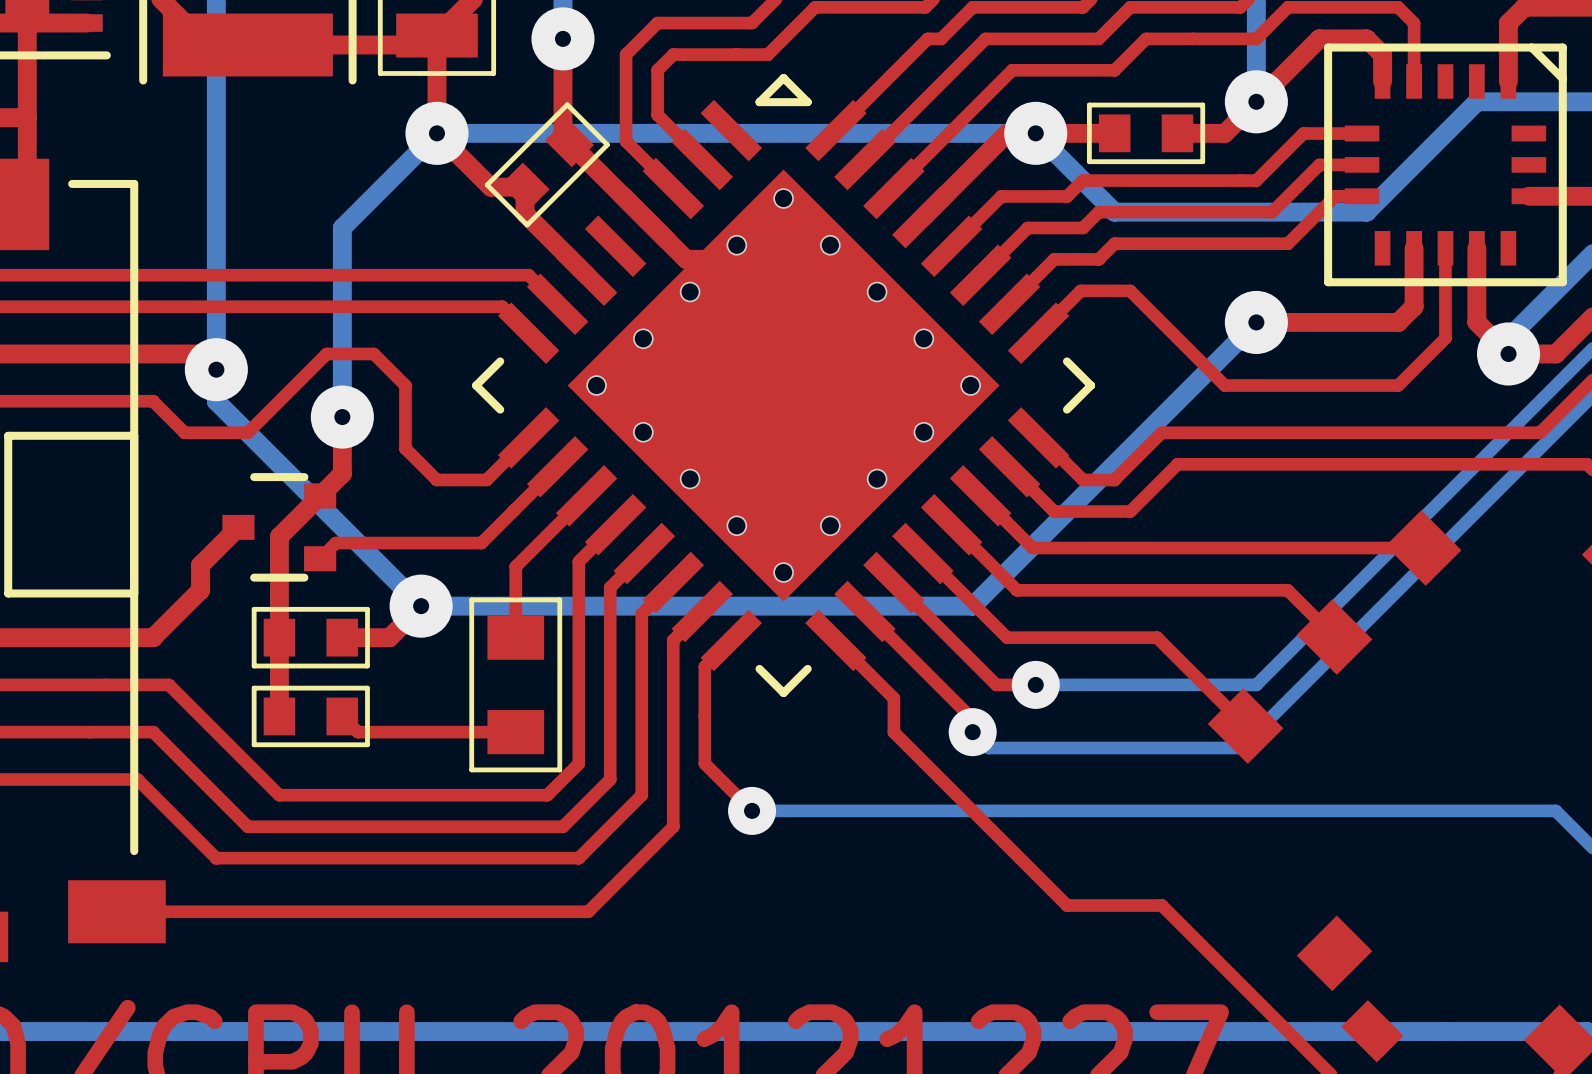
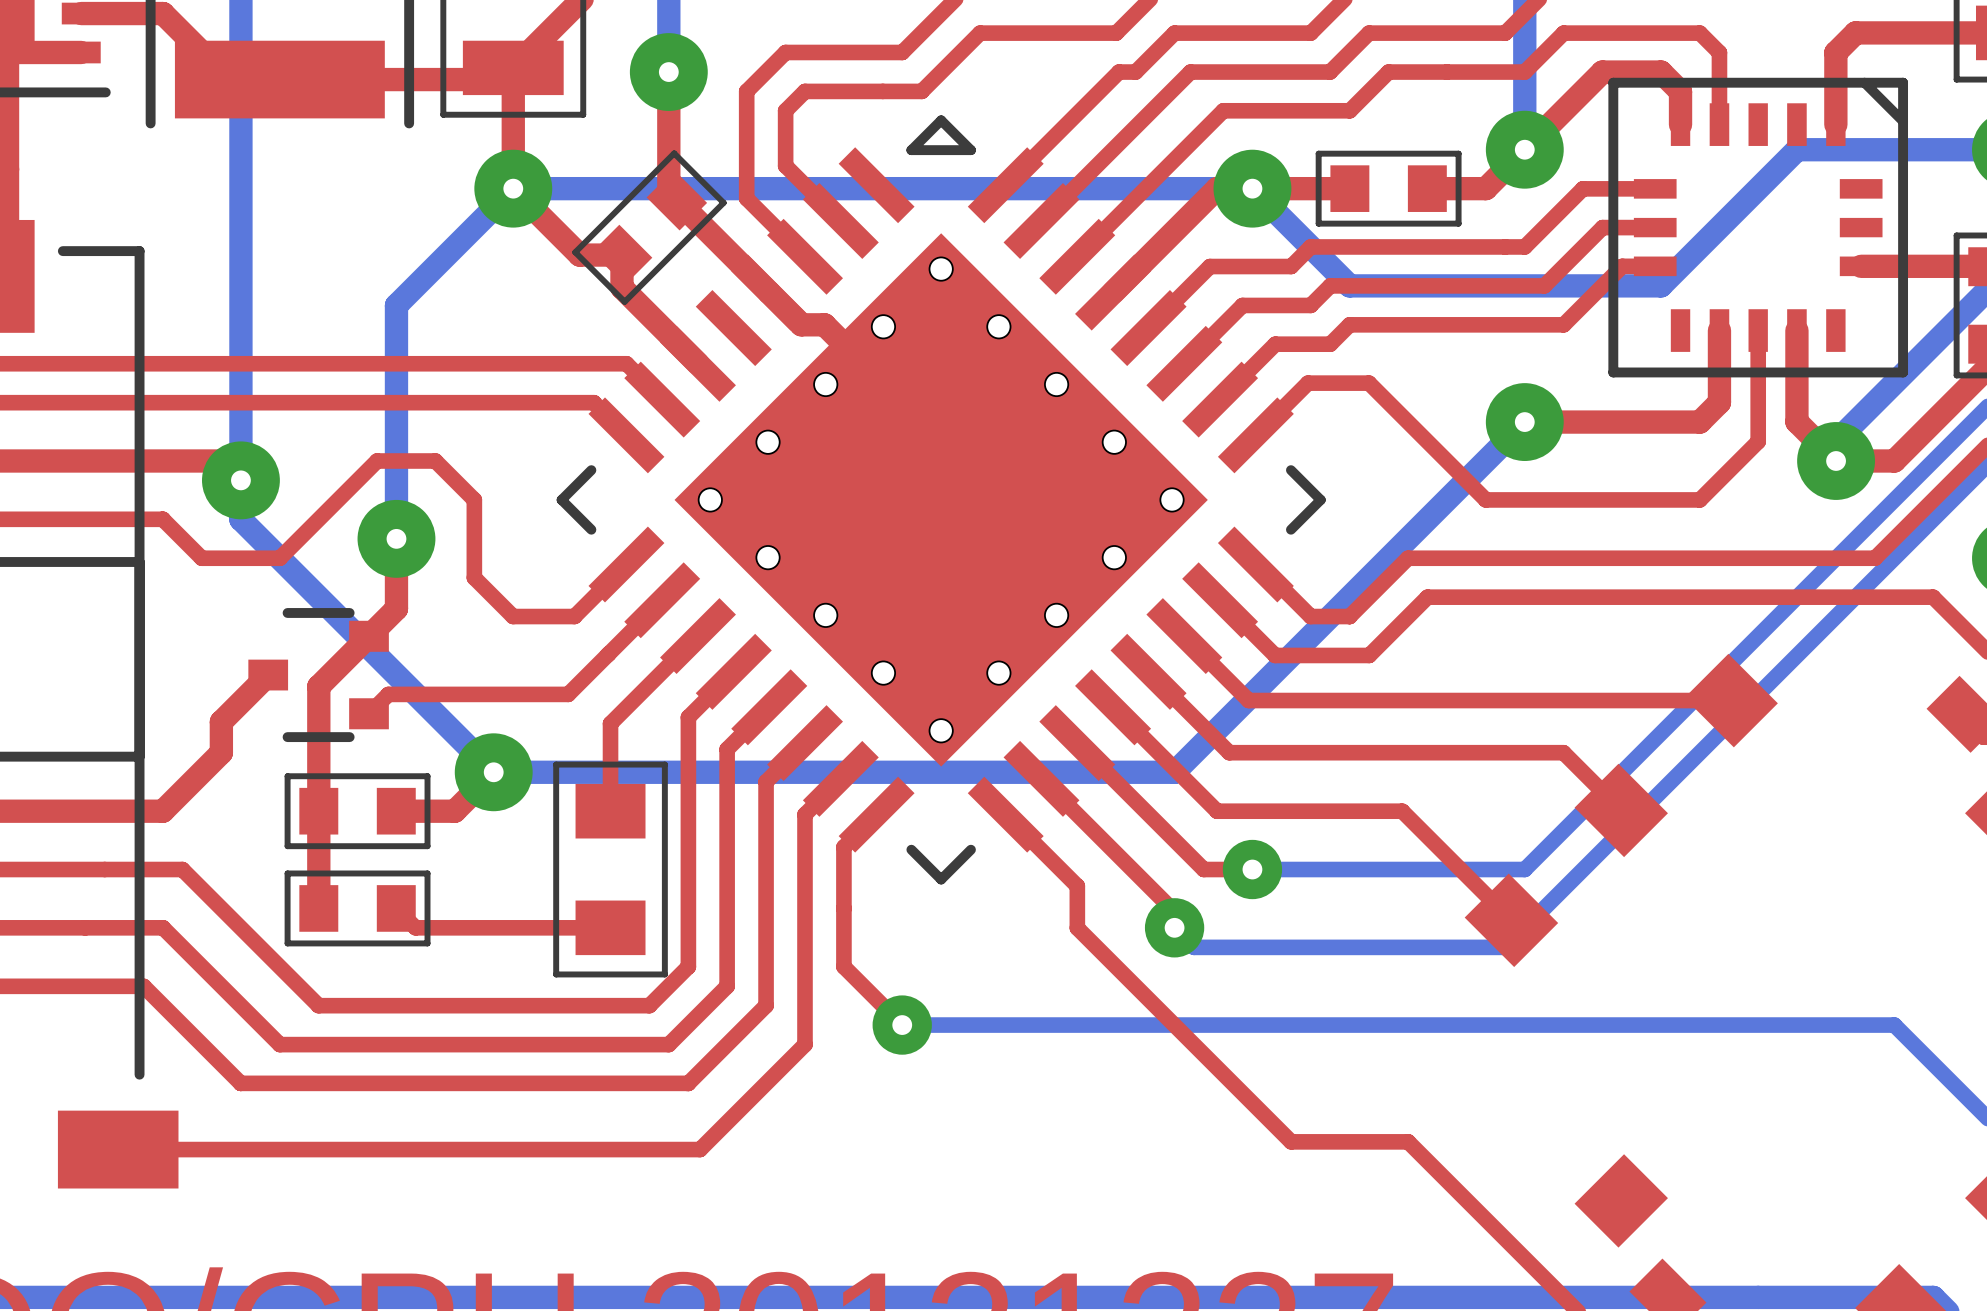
top track: (670, 243) (686, 259) (704, 259) -> (801, 324) (824, 324) (843, 344)

